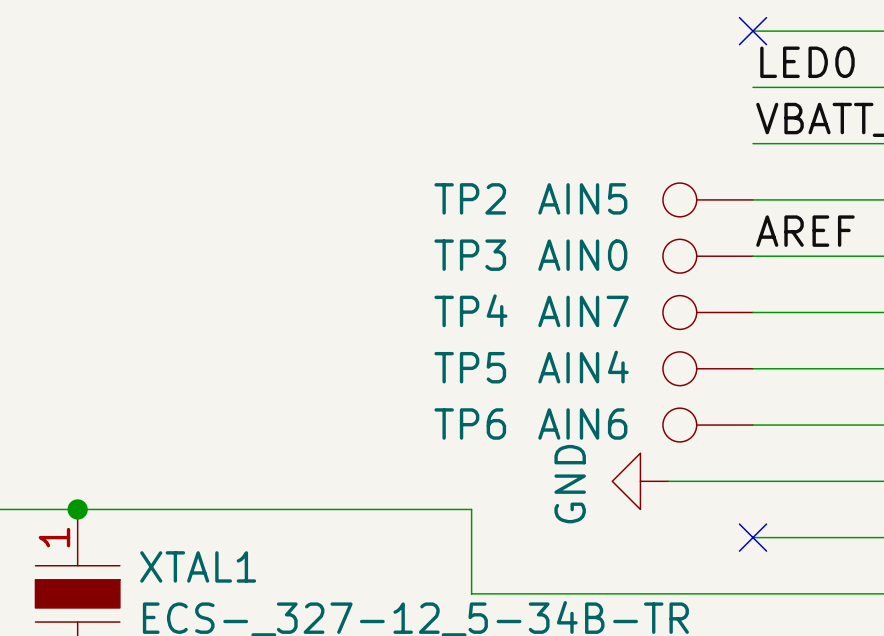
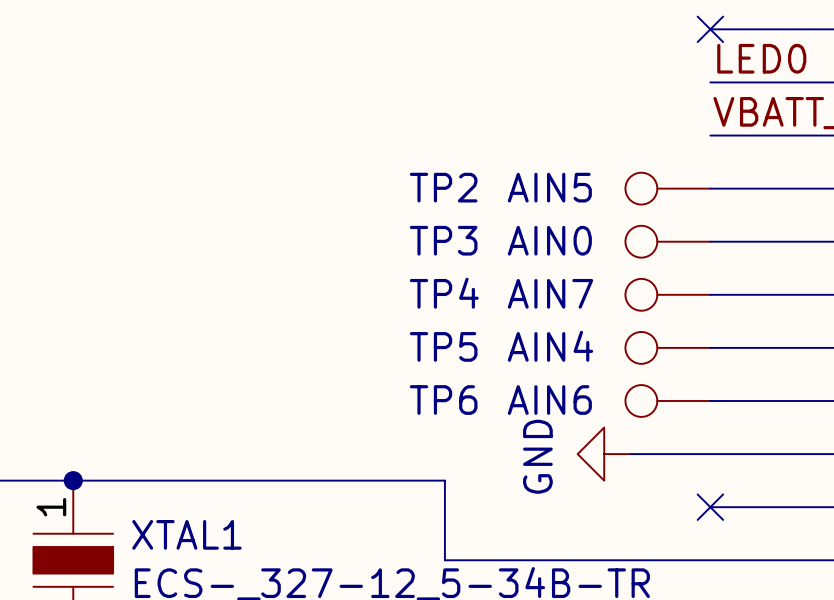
label: AREF (805, 231) -> none

